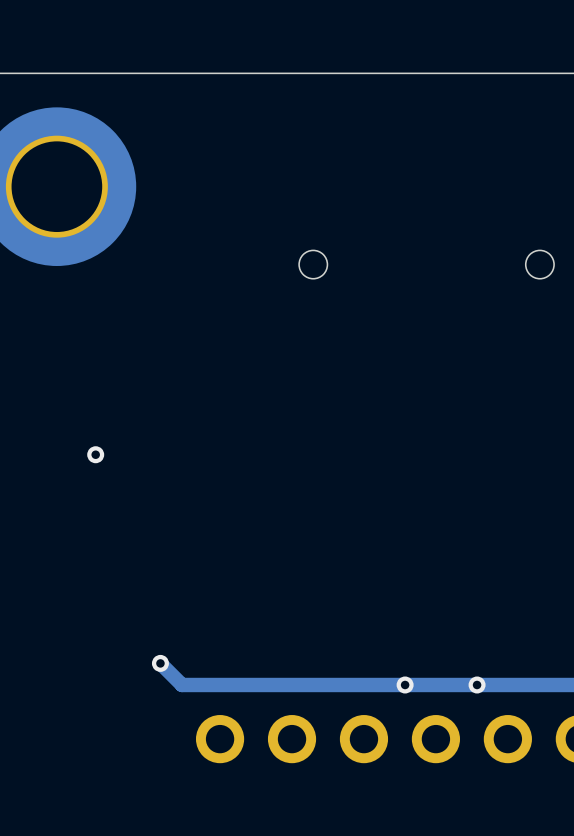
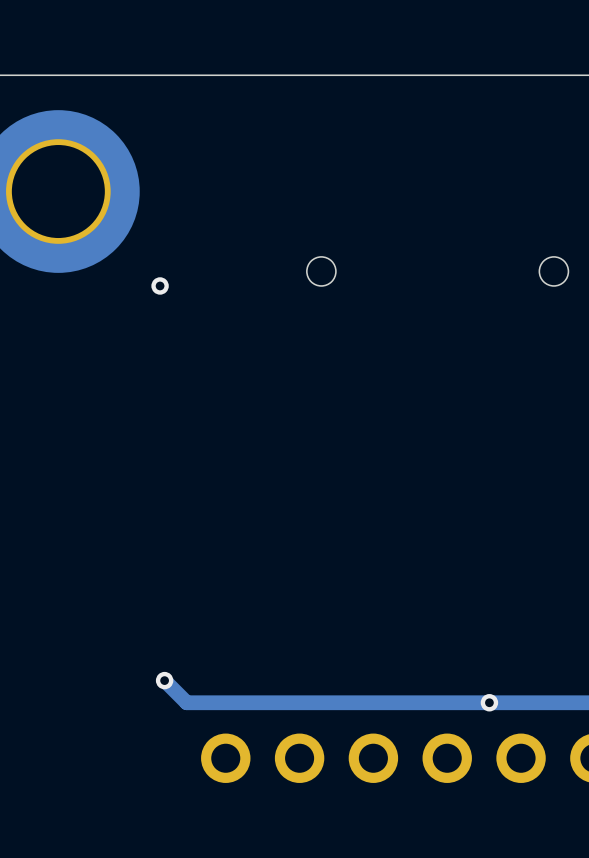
via: none -> (160, 285)
via: (95, 454) -> none
via: (405, 684) -> none

